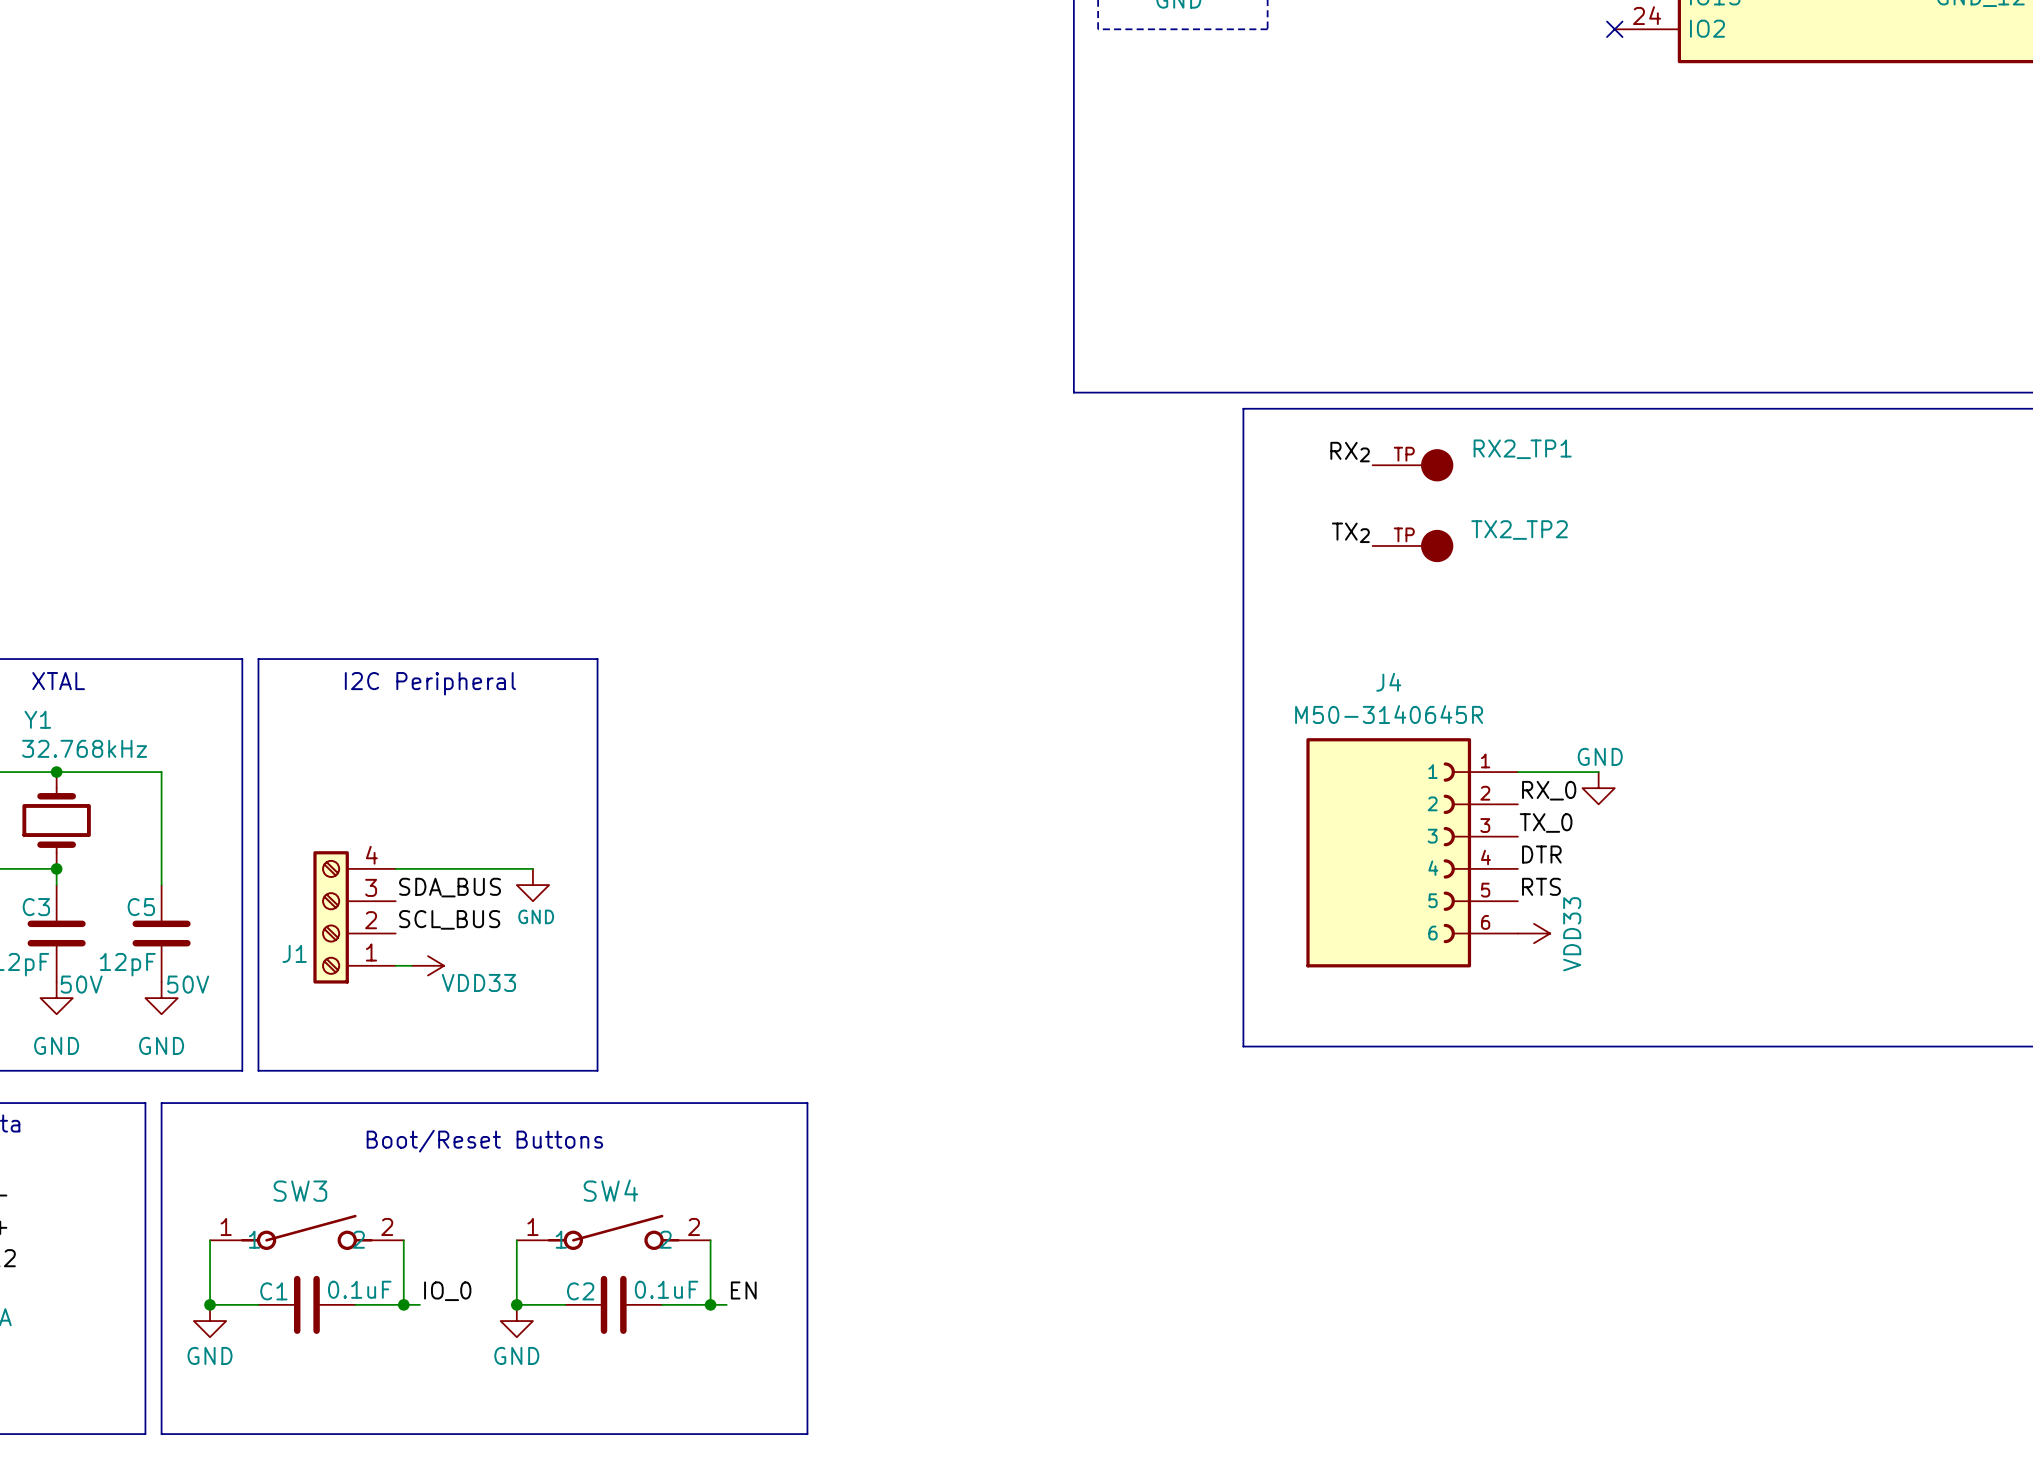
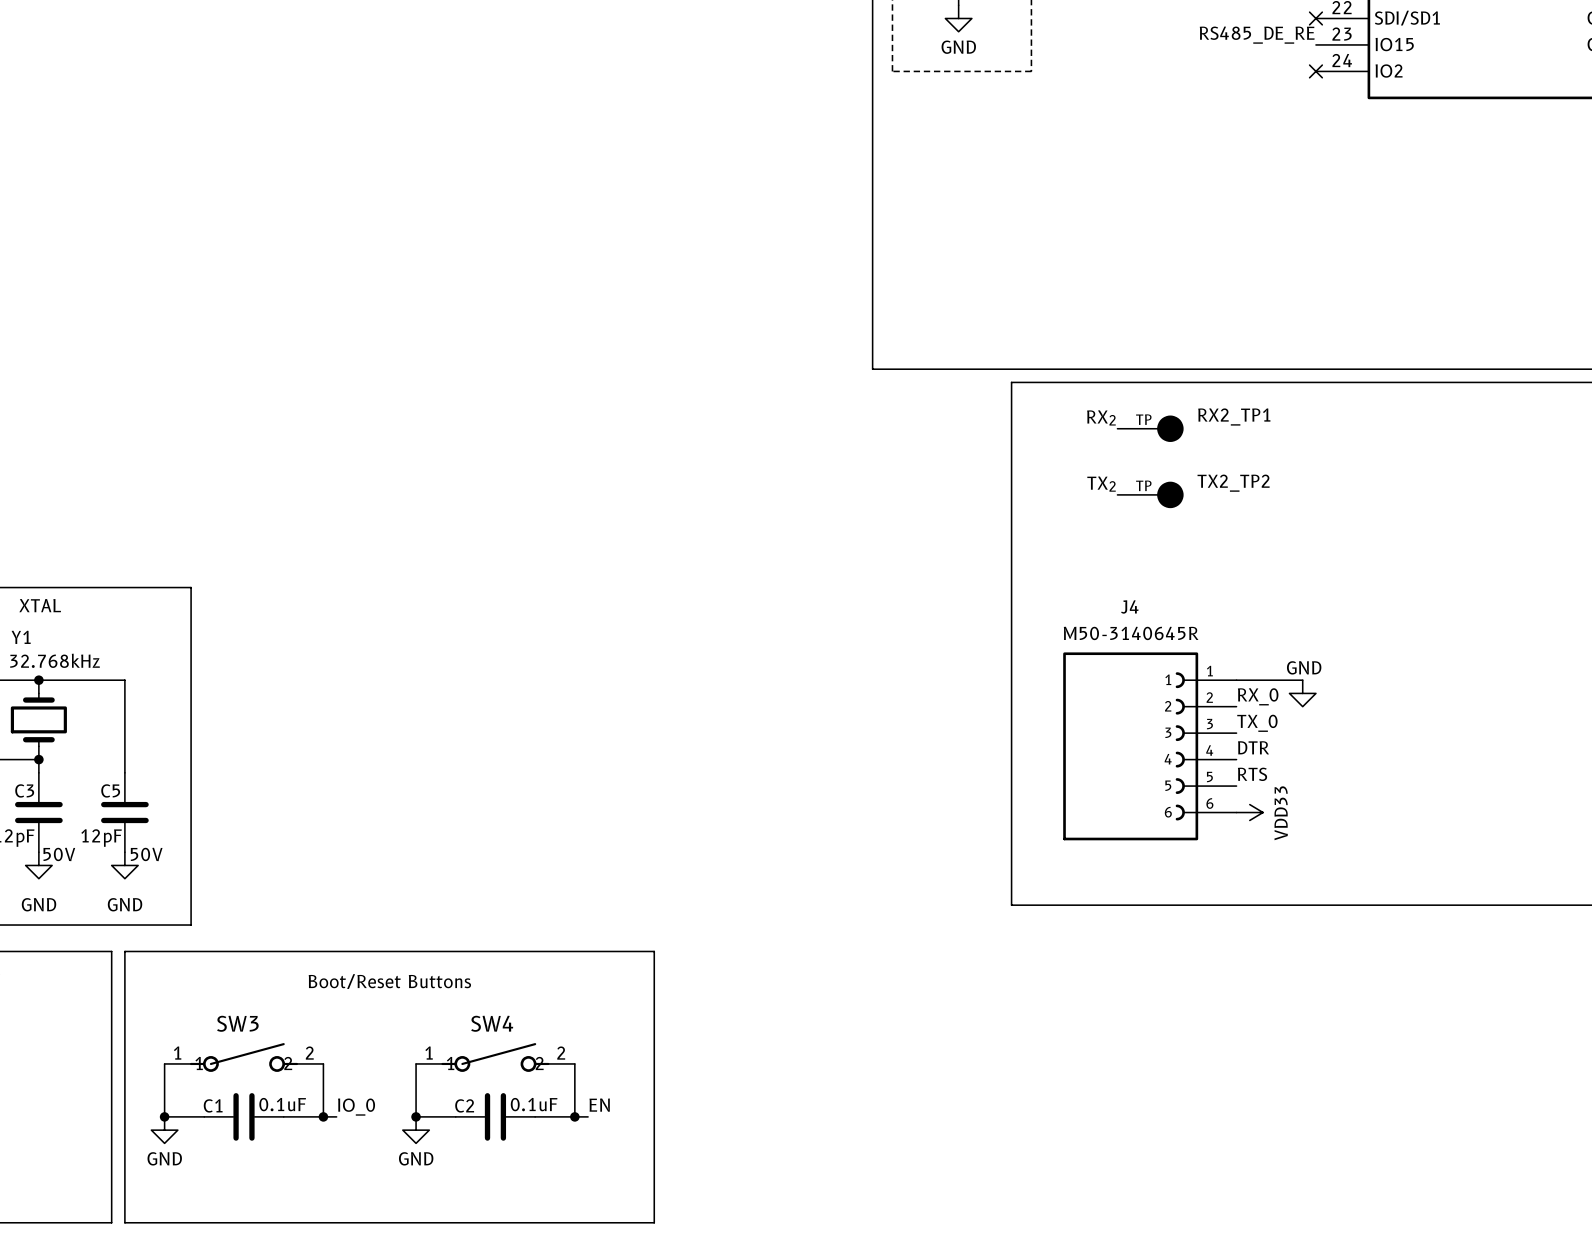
line: (258, 659) (597, 659) (597, 1070) (258, 1070) (258, 659) -> none
text: I2C Peripheral (430, 683) -> none
wire: (395, 868) (532, 868) -> none
power symbol: GND (532, 885) -> none
label: SDA_BUS (450, 887) -> none
J1: (354, 917) -> none
label: SCL_BUS (449, 919) -> none
wire: (395, 965) (411, 965) -> none
power symbol: VDD33 (428, 965) -> none

